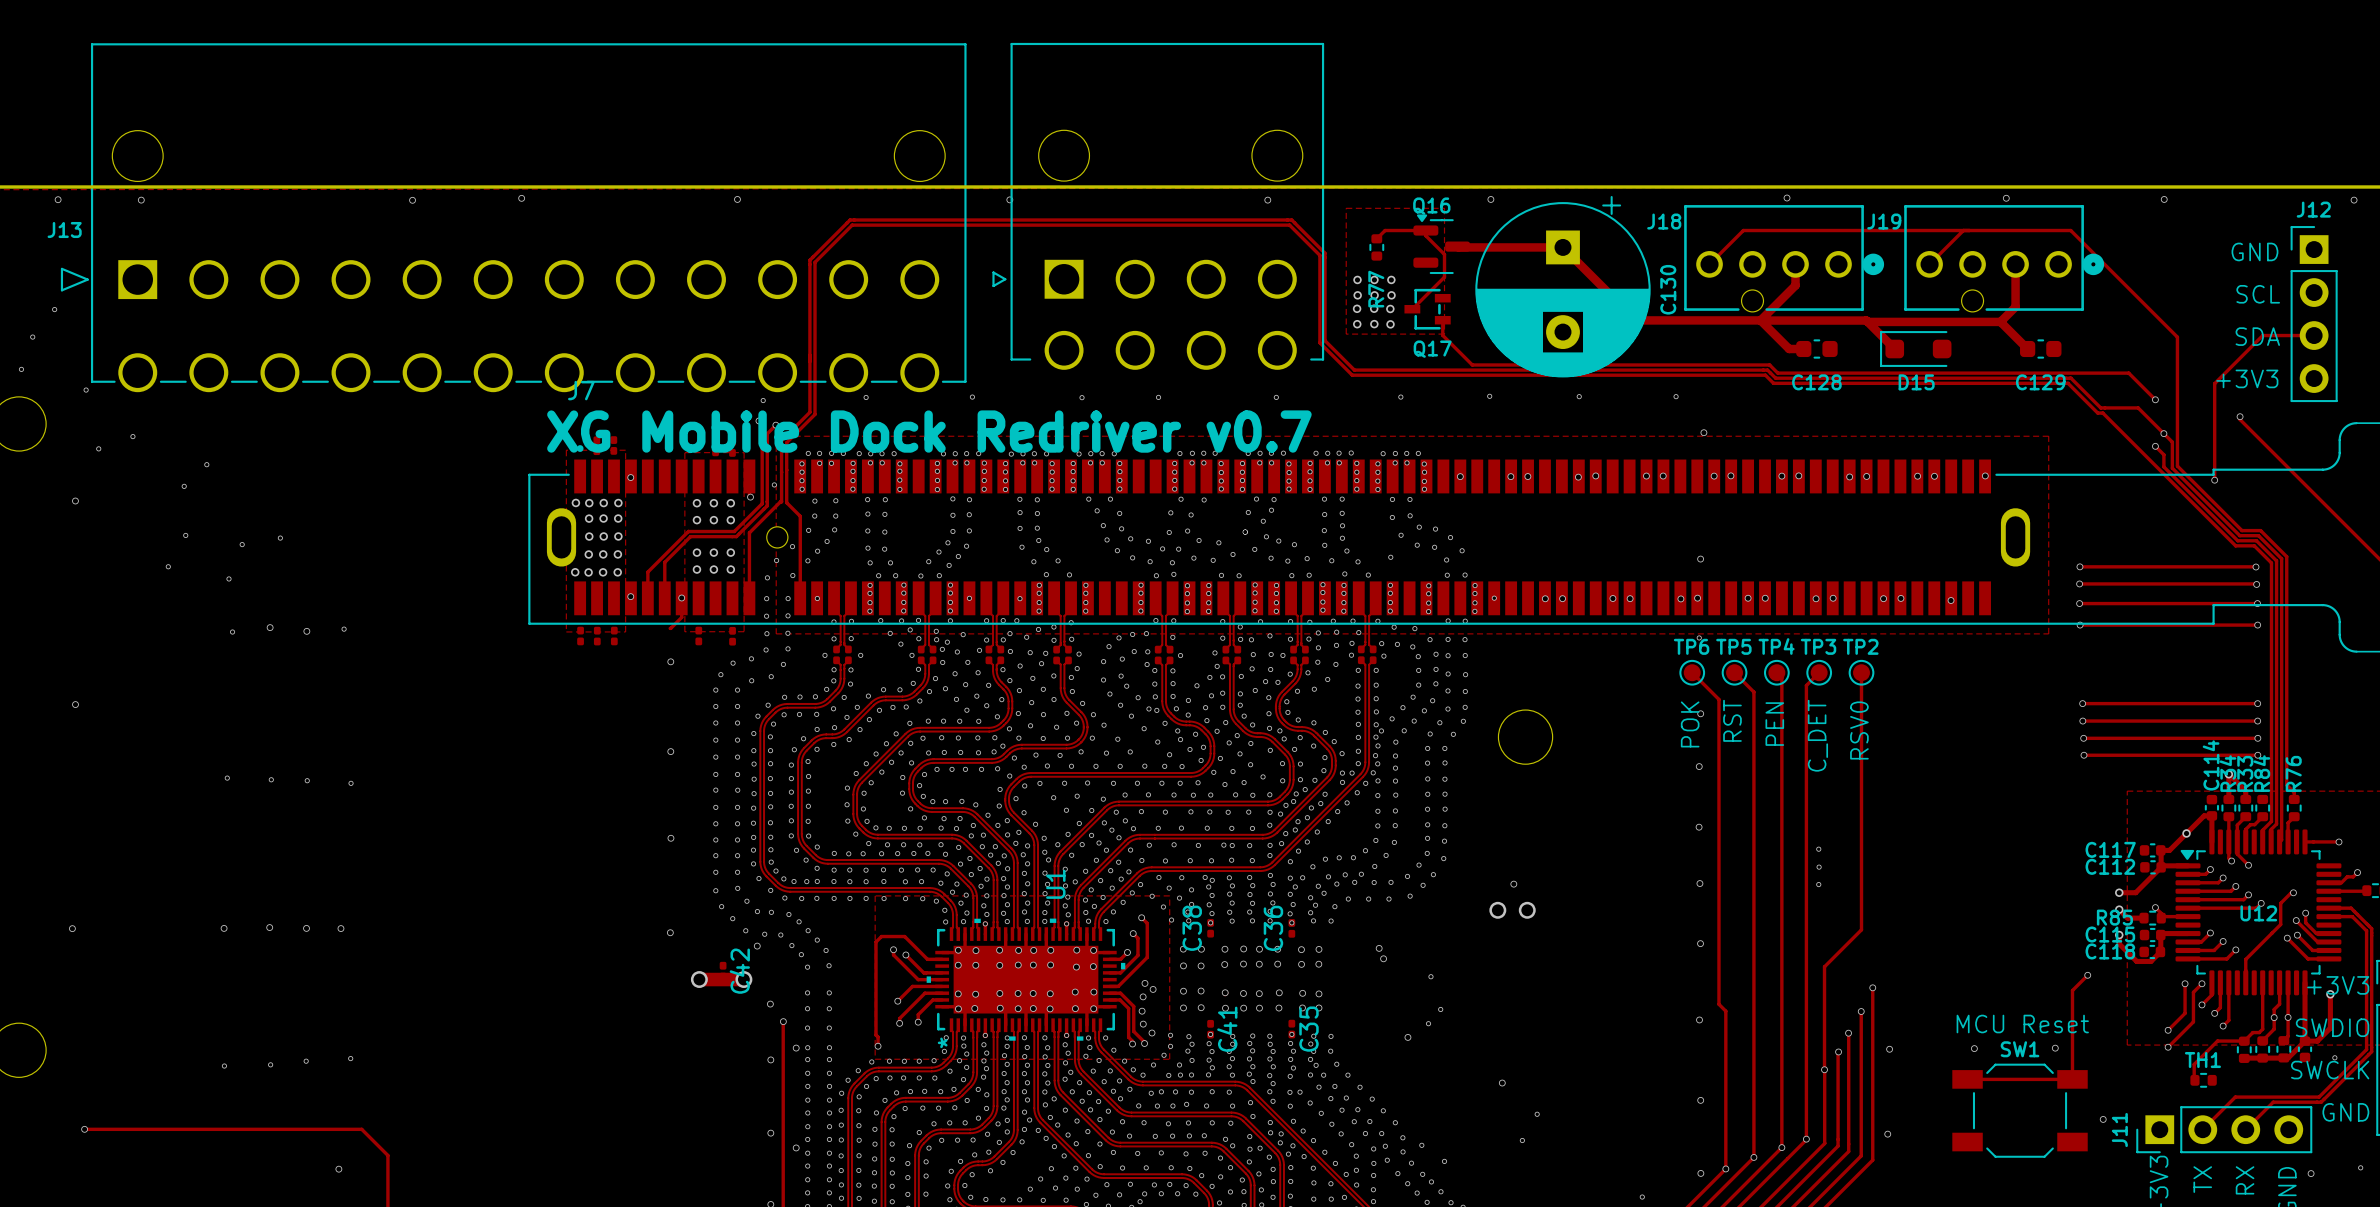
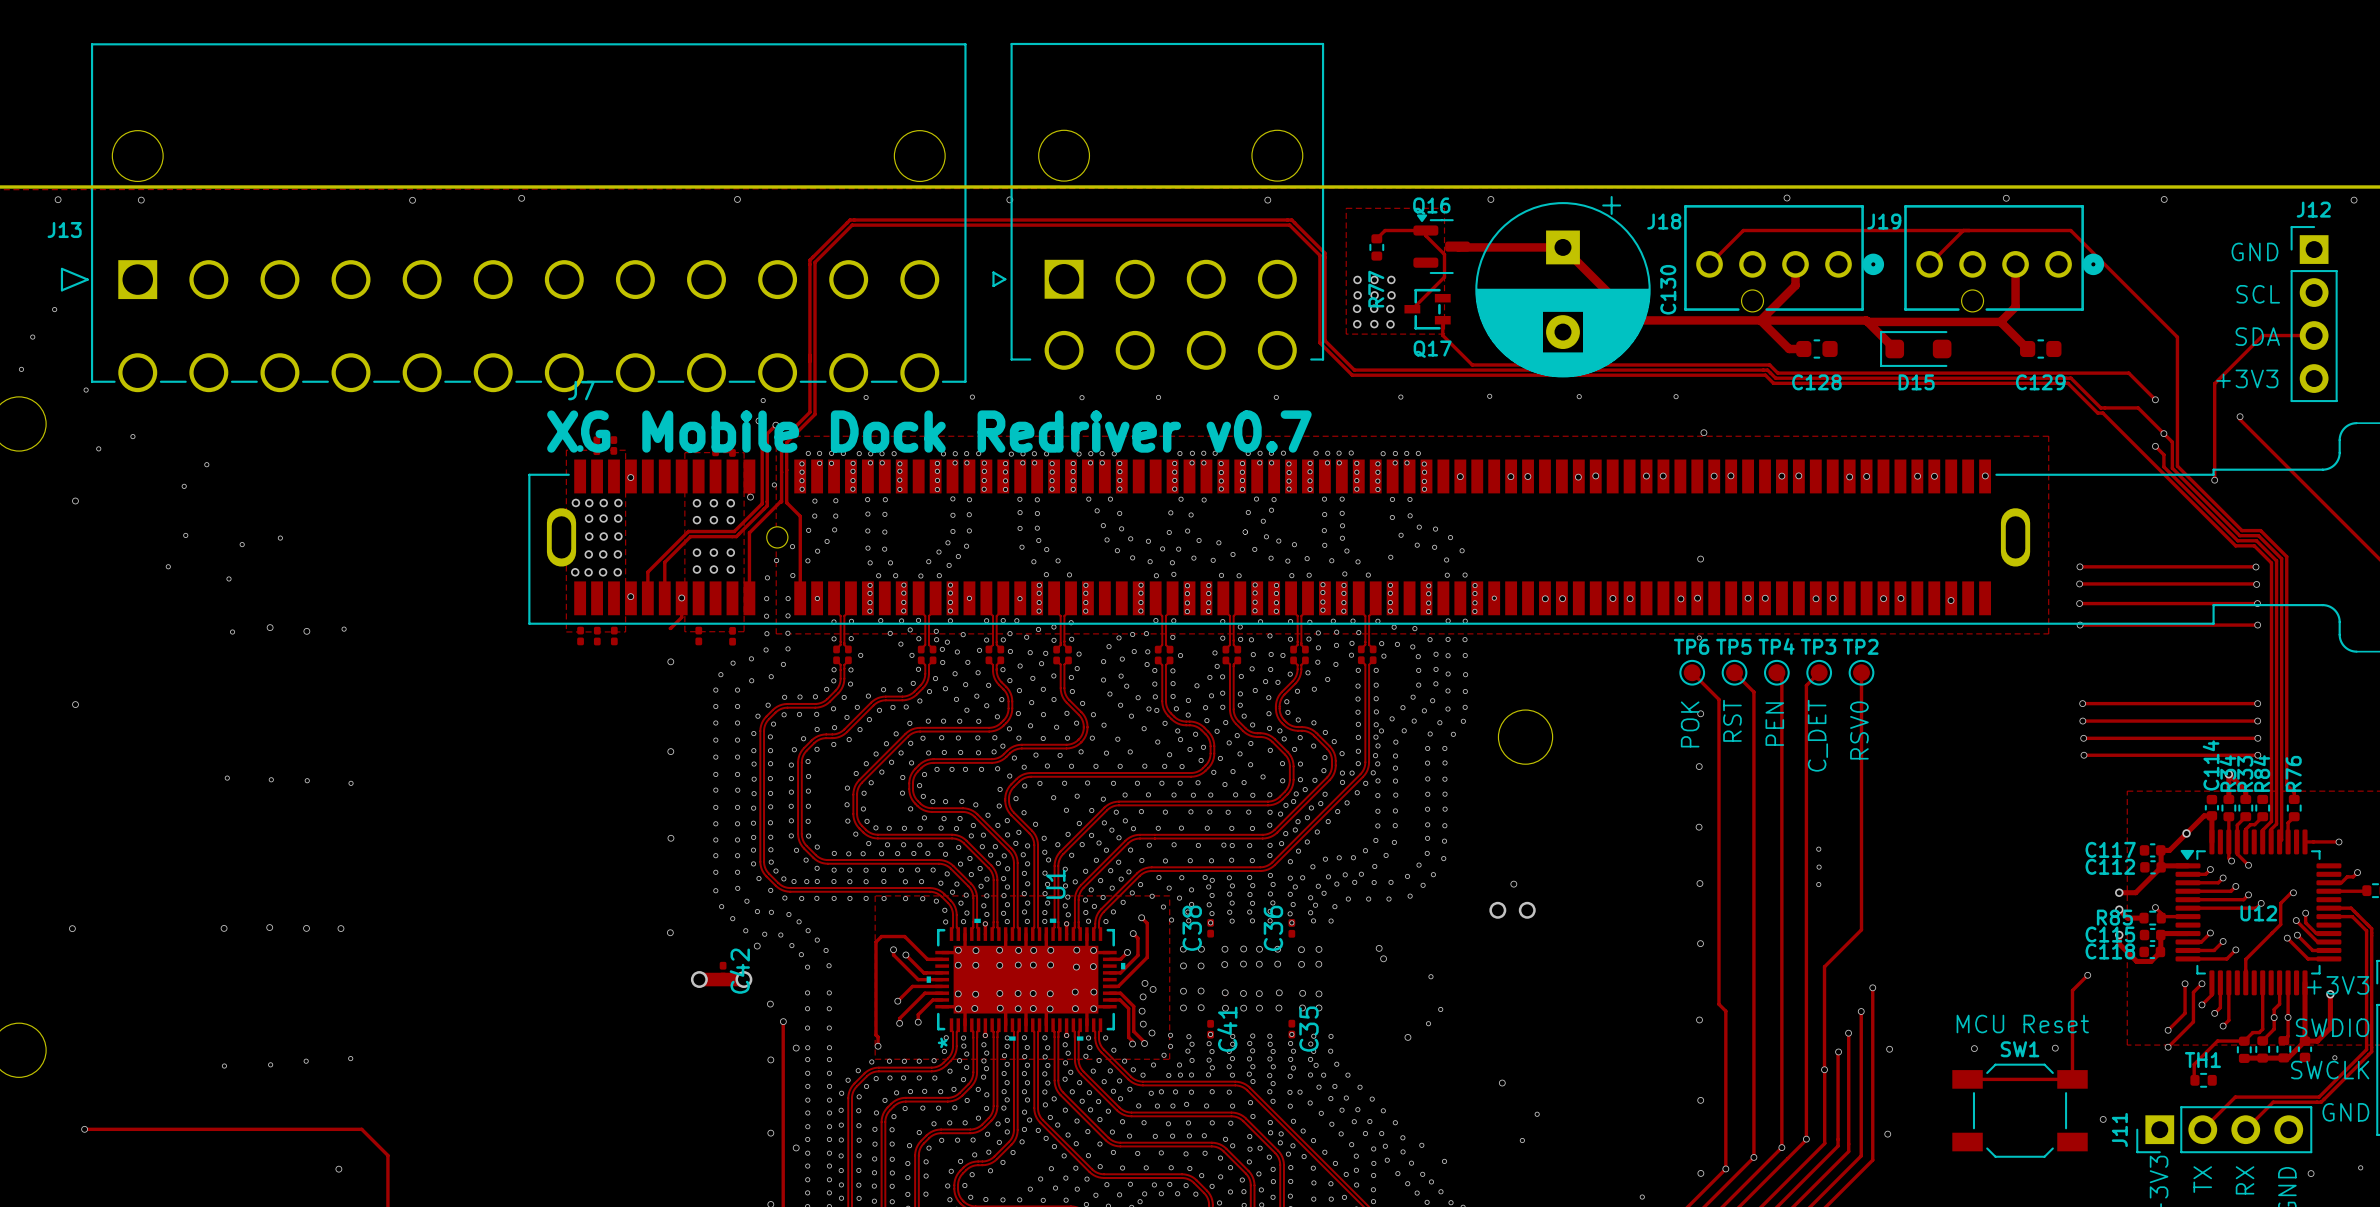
via: (824, 655) -> none

